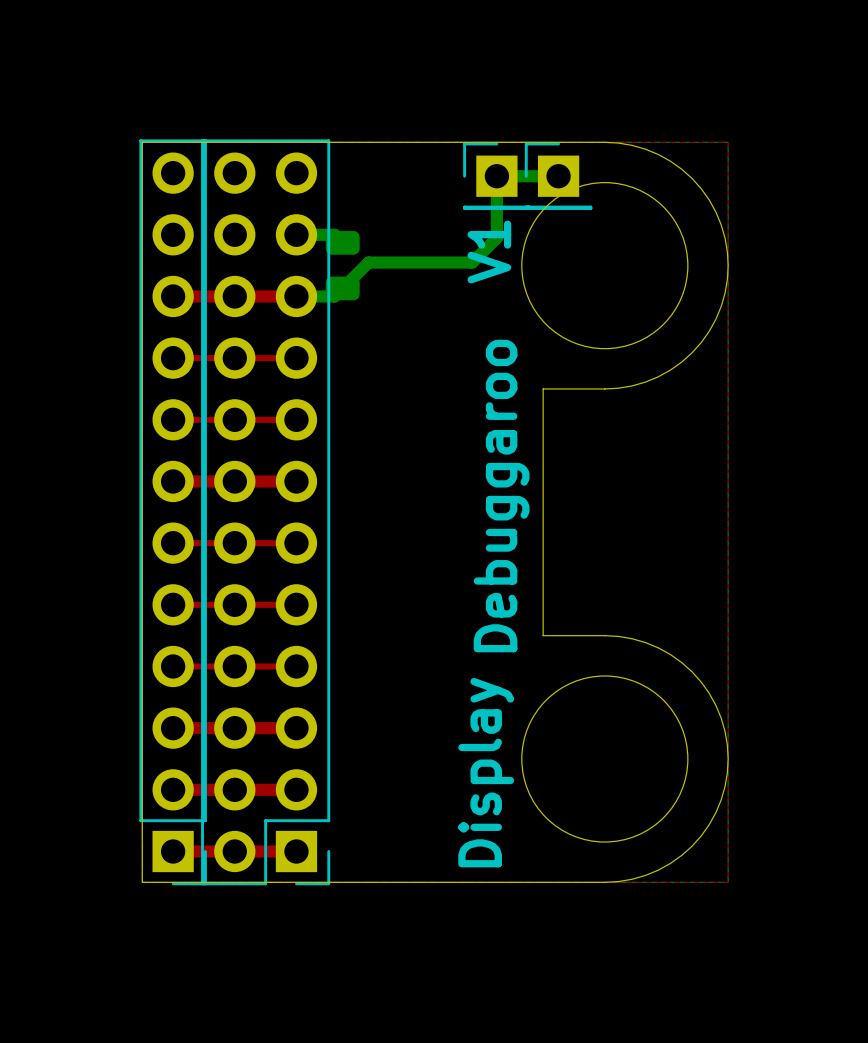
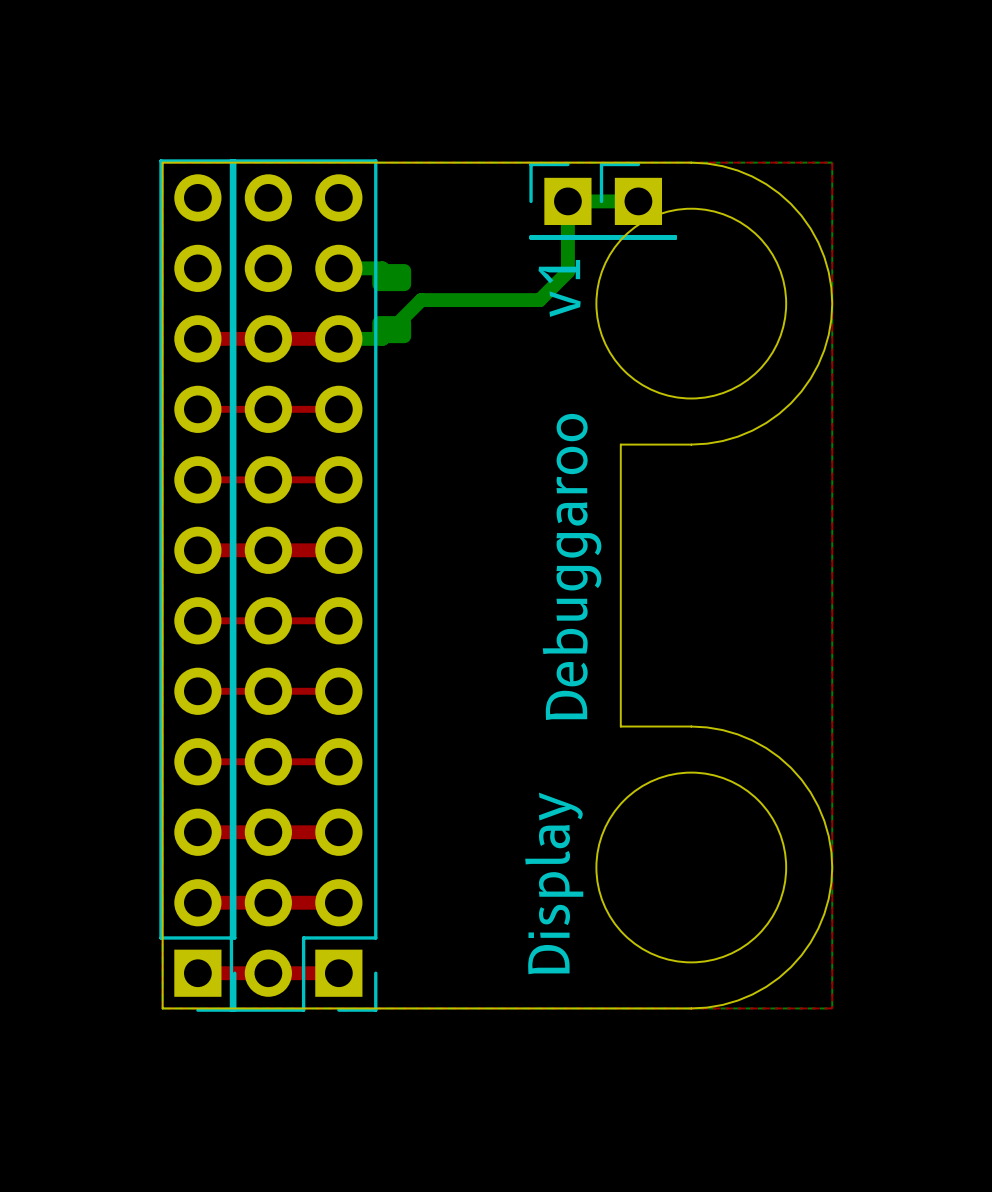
text: V1 (489, 251) -> v1 (559, 288)

